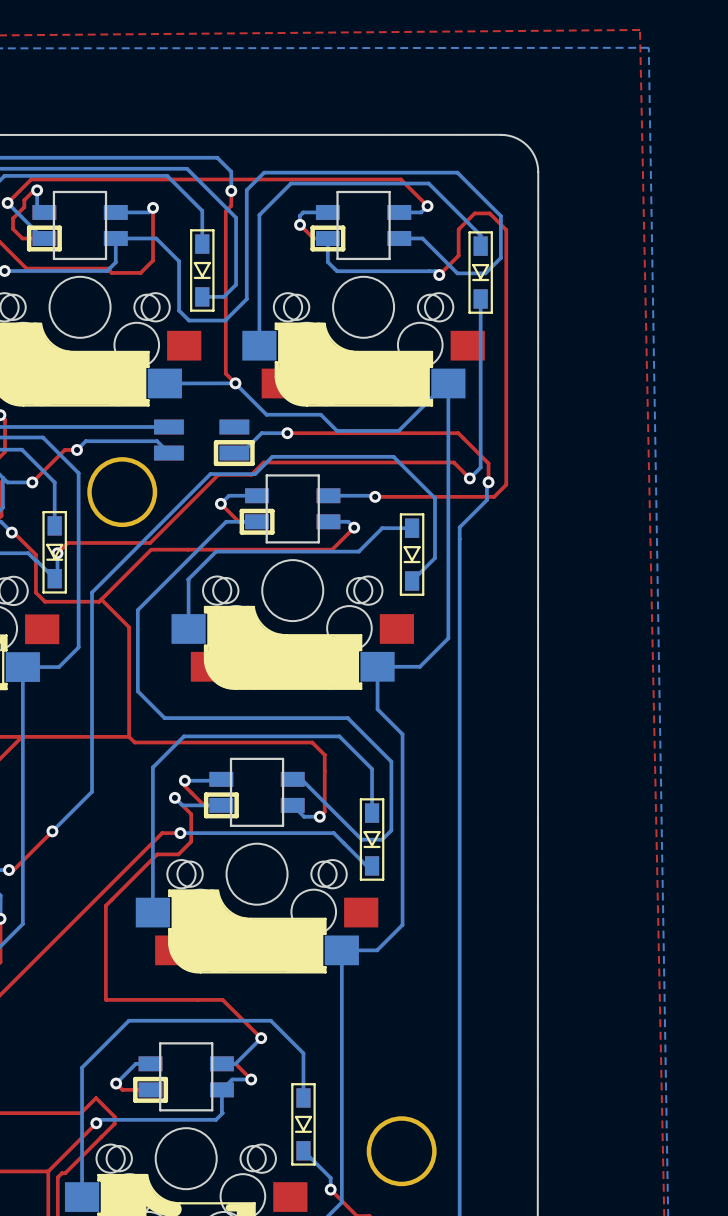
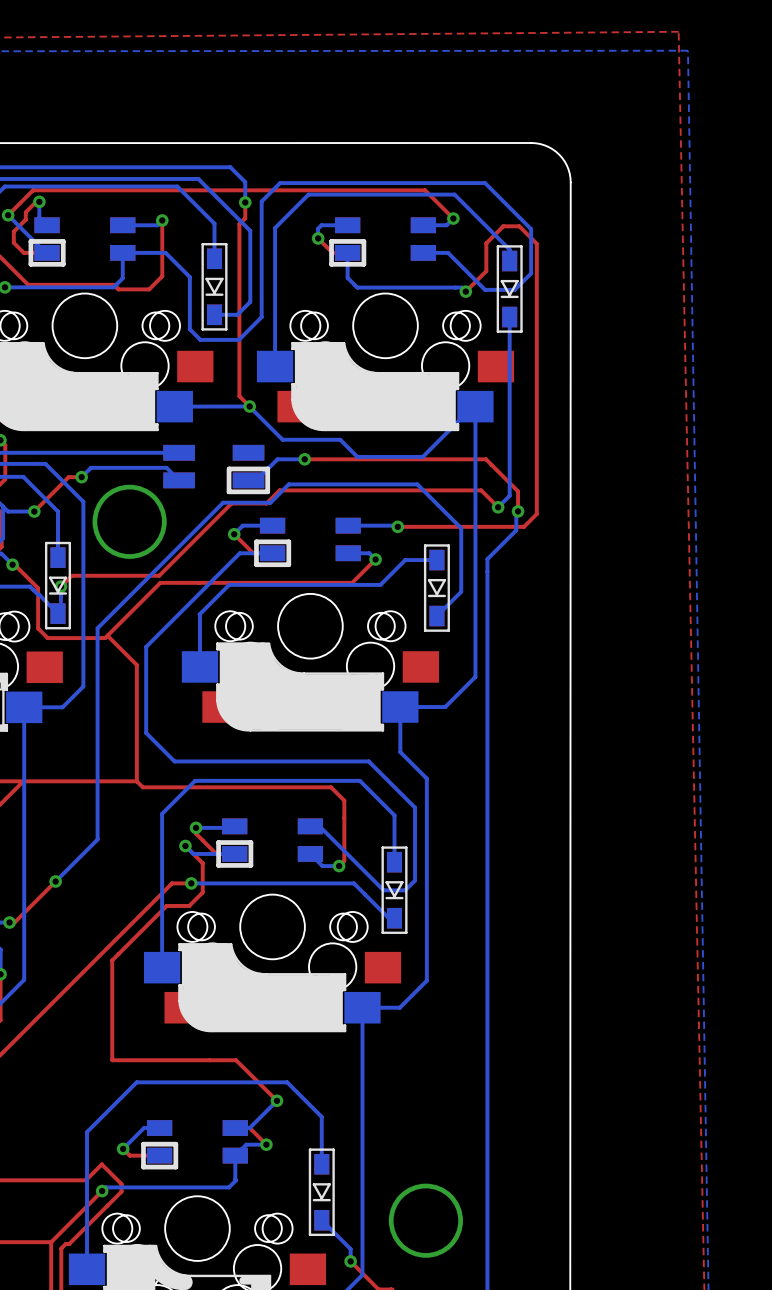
board edge: (106, 191) (53, 191) (53, 258) (106, 258) (106, 191) -> none
board edge: (389, 191) (389, 258) (337, 258) (337, 191) (389, 191) -> none
board edge: (318, 475) (266, 475) (266, 542) (318, 542) (318, 475) -> none
board edge: (283, 758) (231, 758) (231, 825) (283, 825) (283, 758) -> none
board edge: (212, 1043) (160, 1043) (160, 1110) (212, 1110) (212, 1043) -> none

